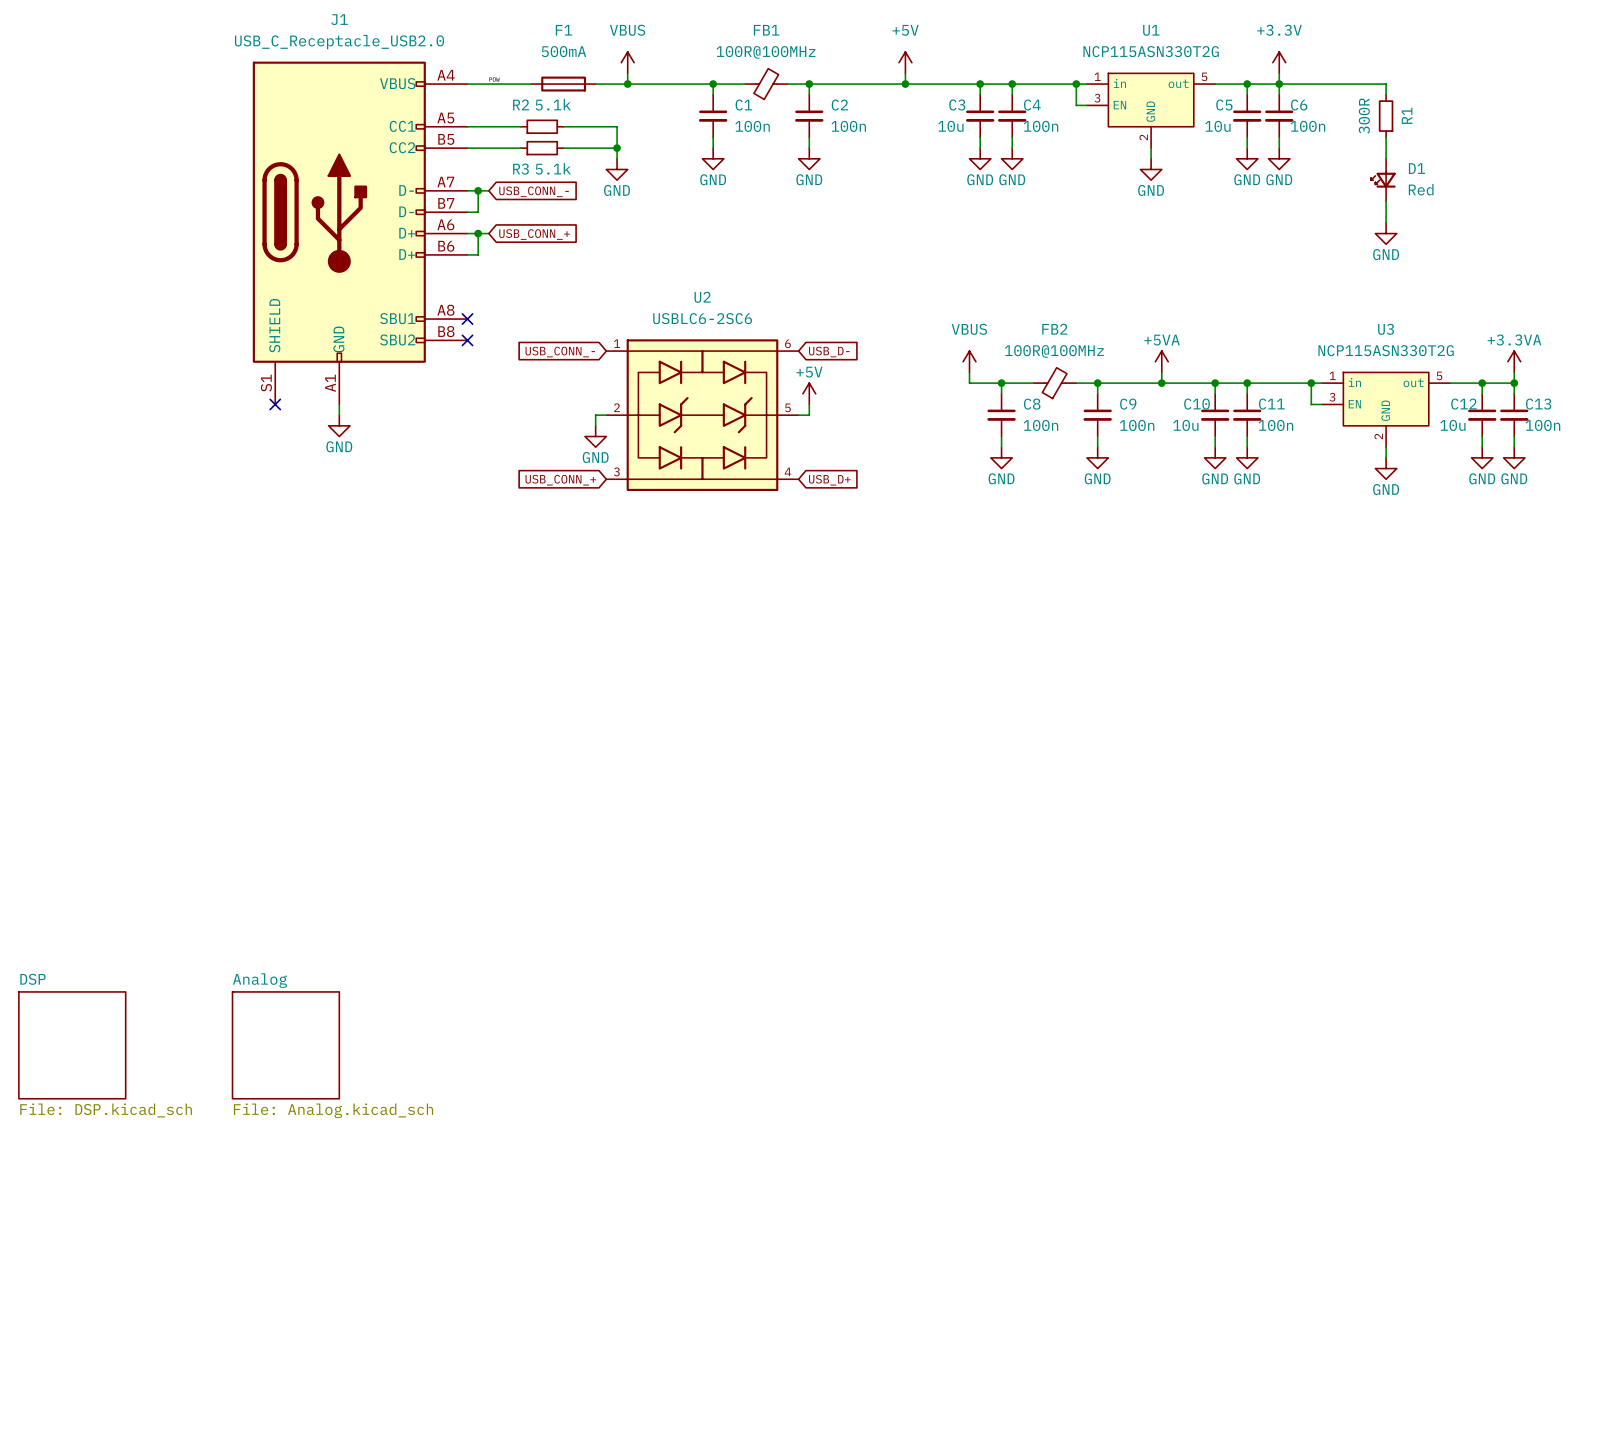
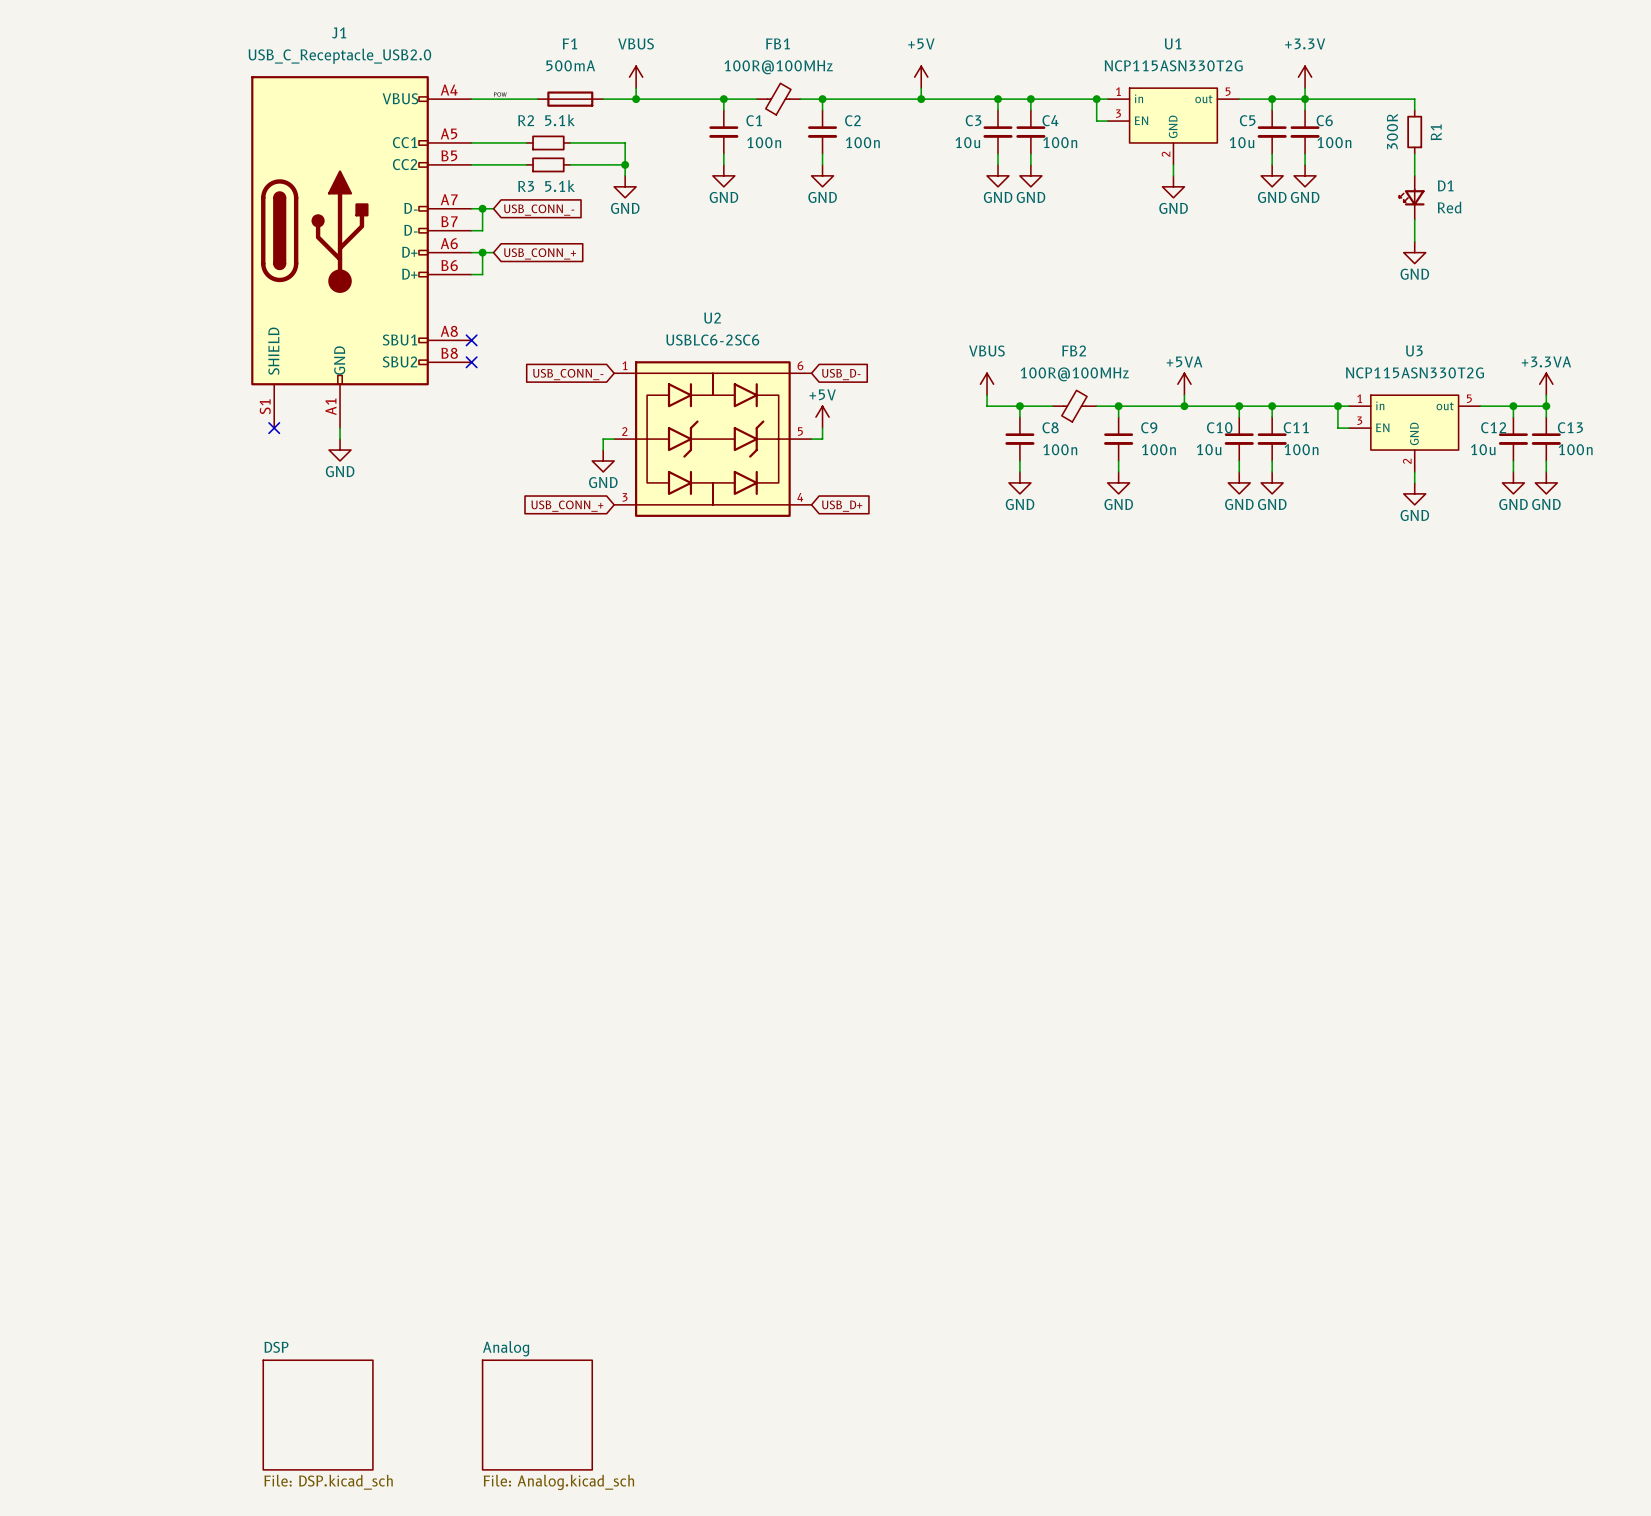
sheet DSP: File: DSP.kicad_sch (72, 1045) -> none
sheet Analog: File: Analog.kicad_sch (285, 1045) -> none
sheet DSP: none -> File: DSP.kicad_sch (318, 1415)
sheet Analog: none -> File: Analog.kicad_sch (537, 1415)

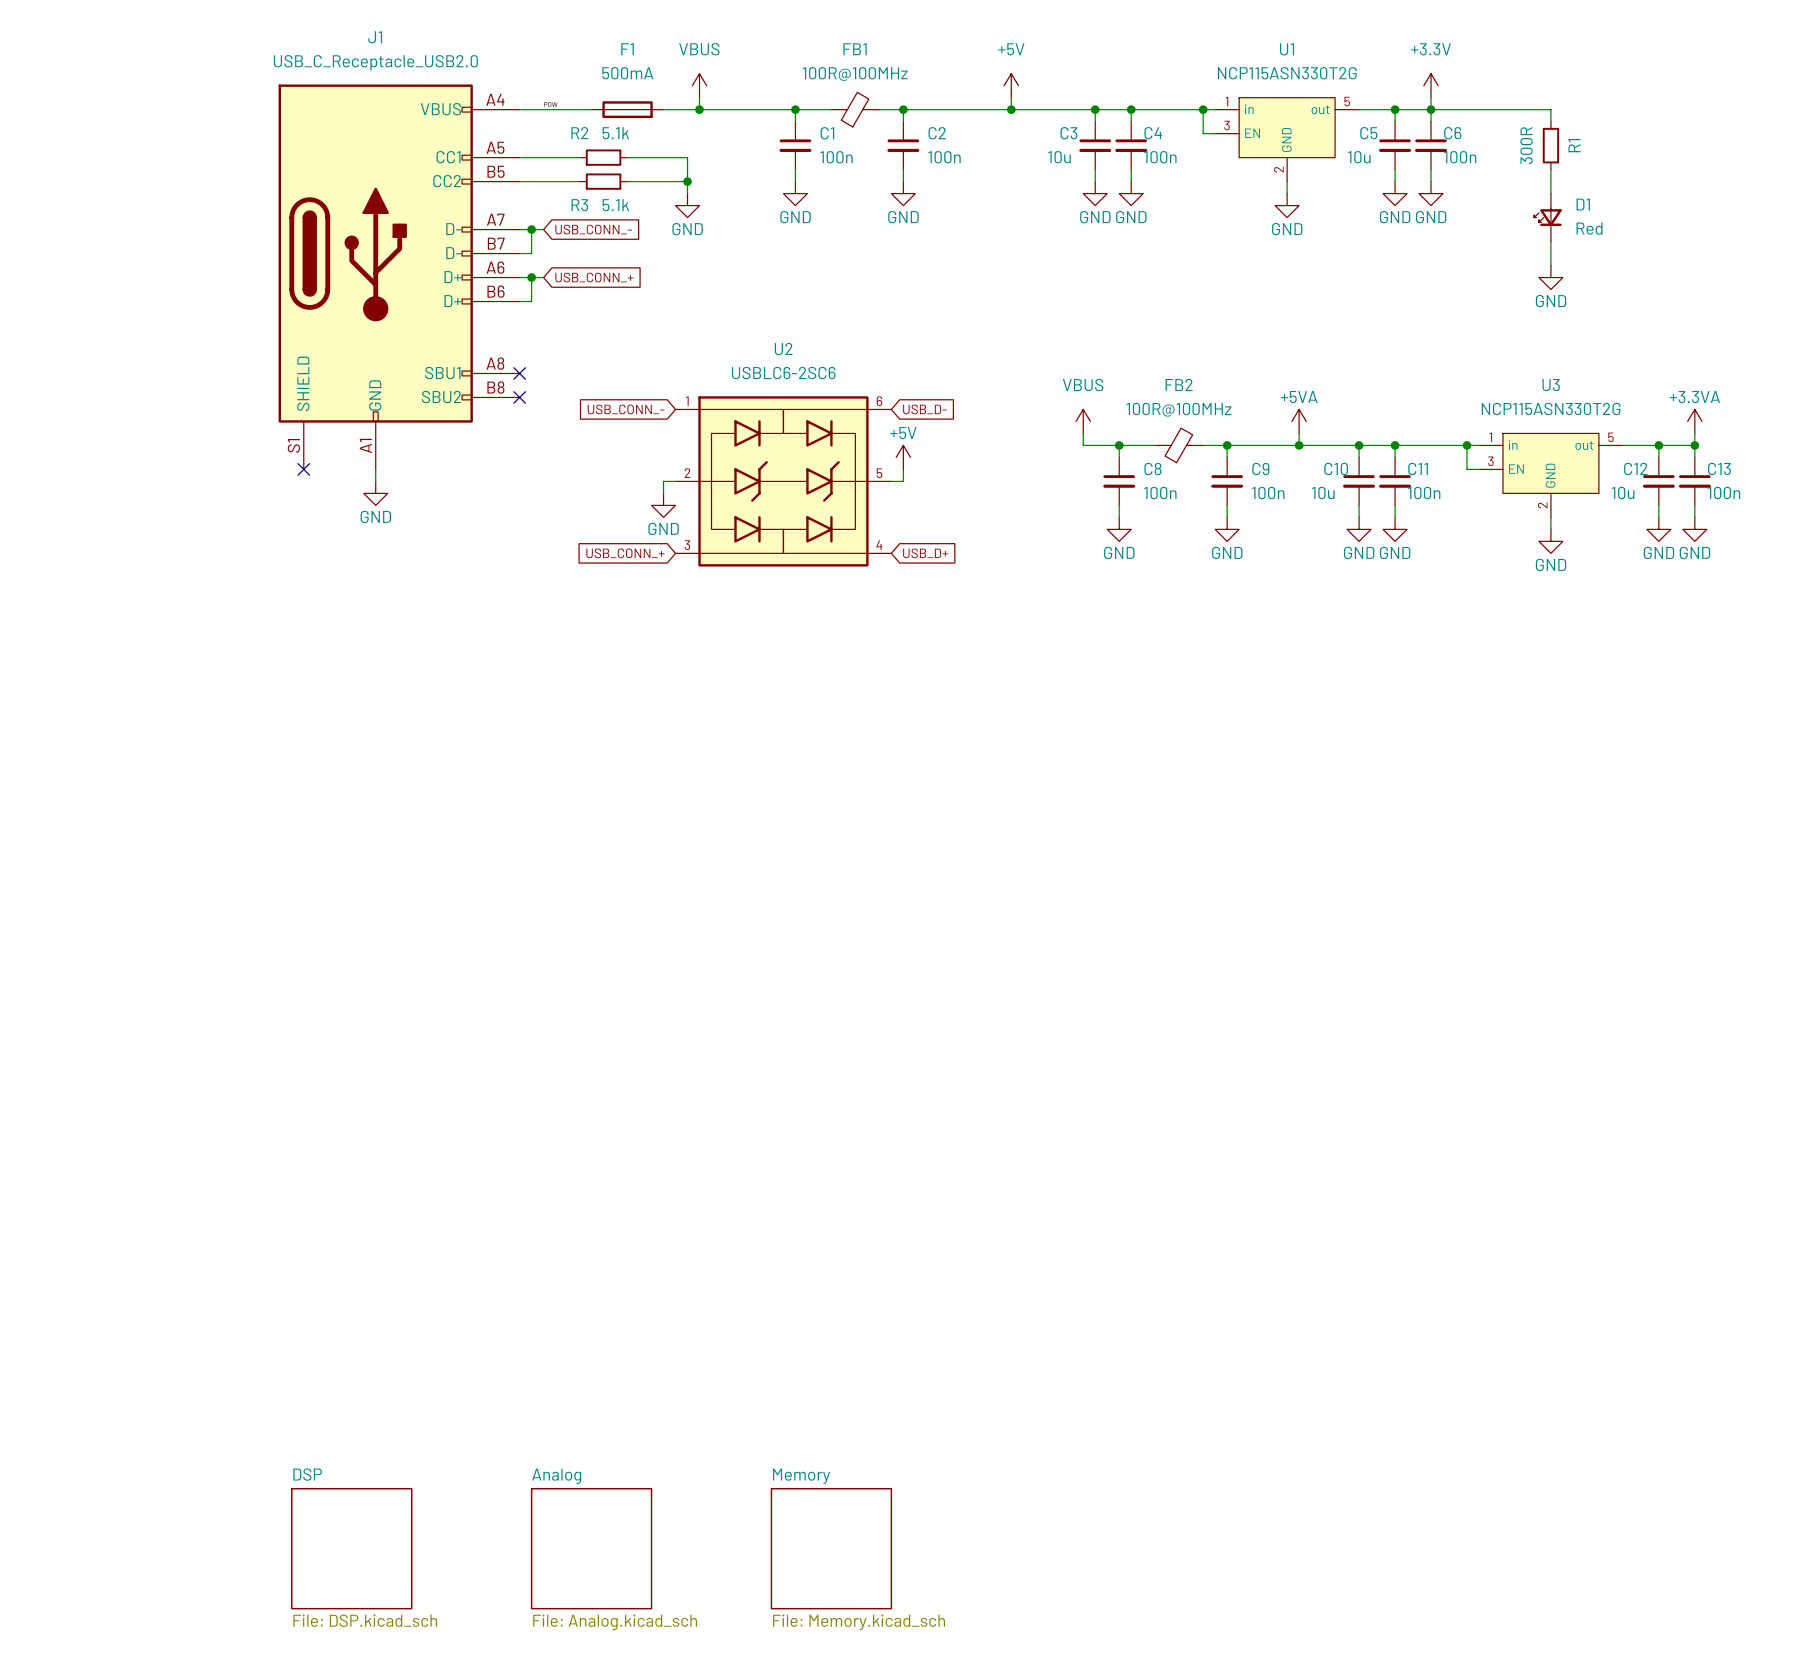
sheet Memory: none -> File: Memory.kicad_sch (831, 1548)

